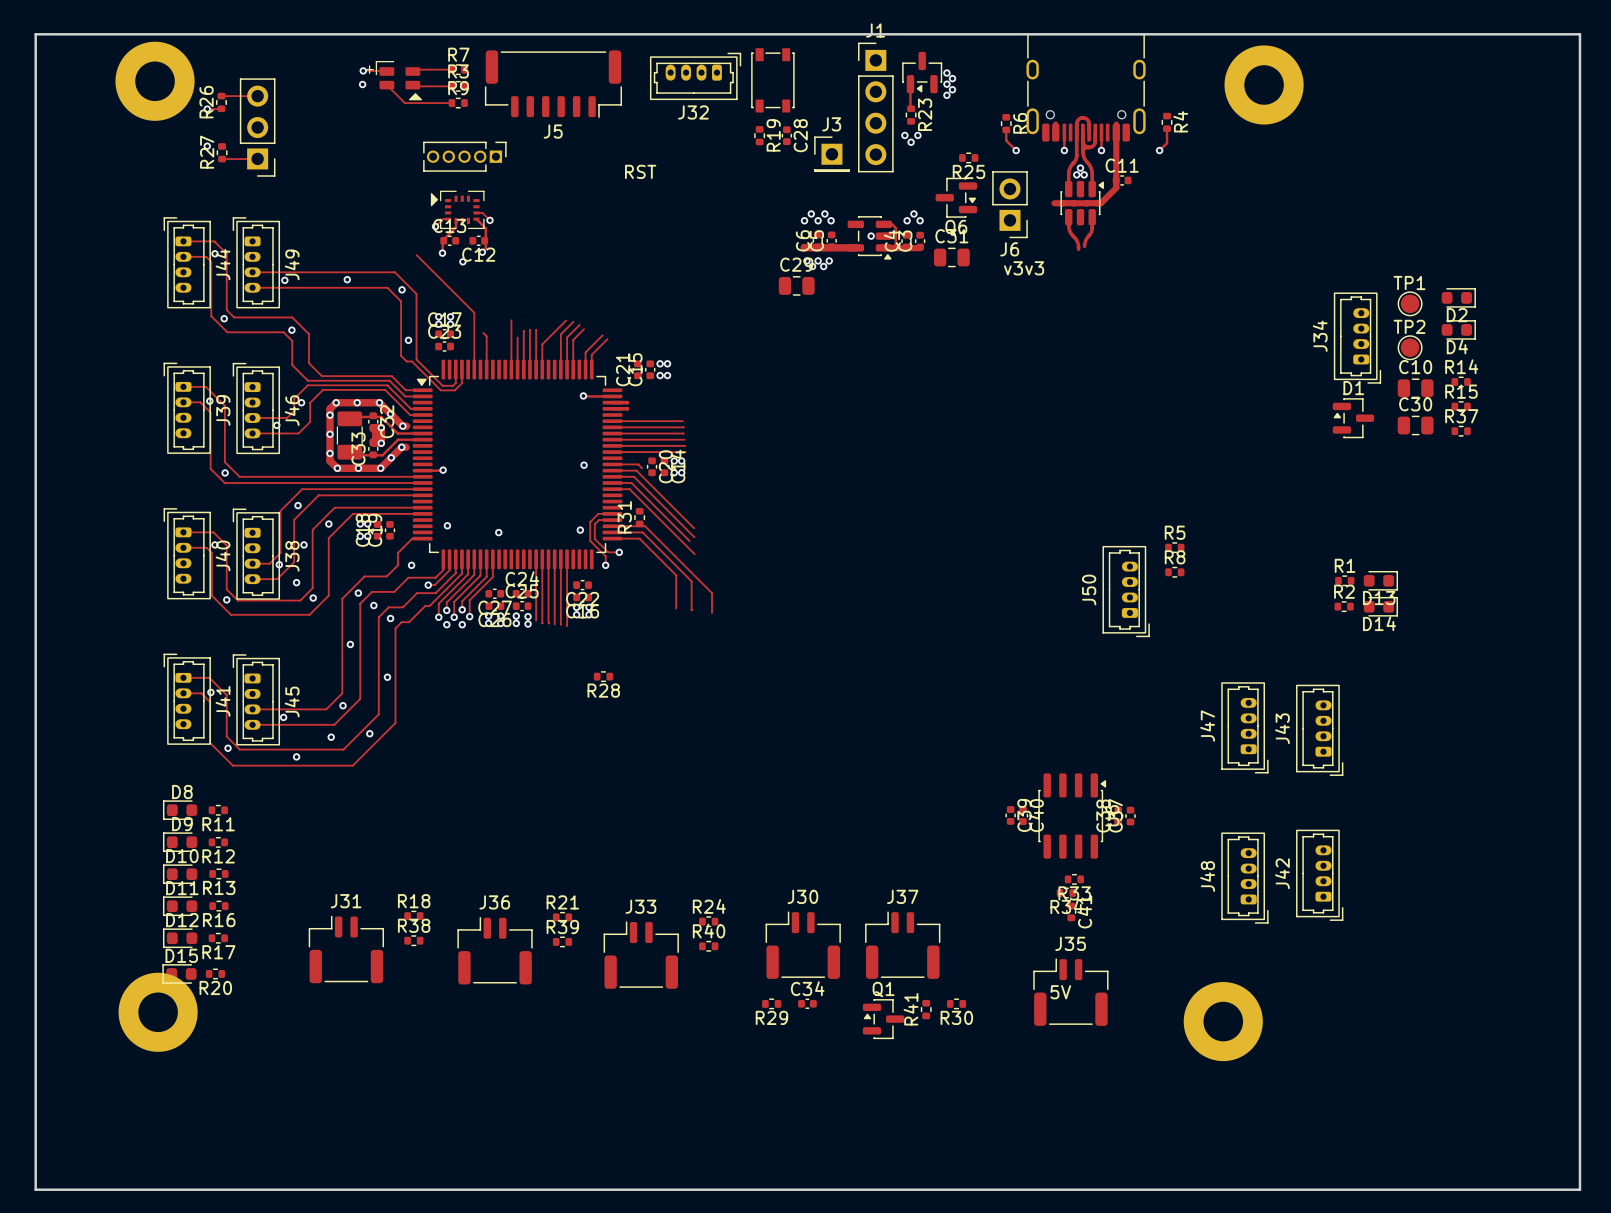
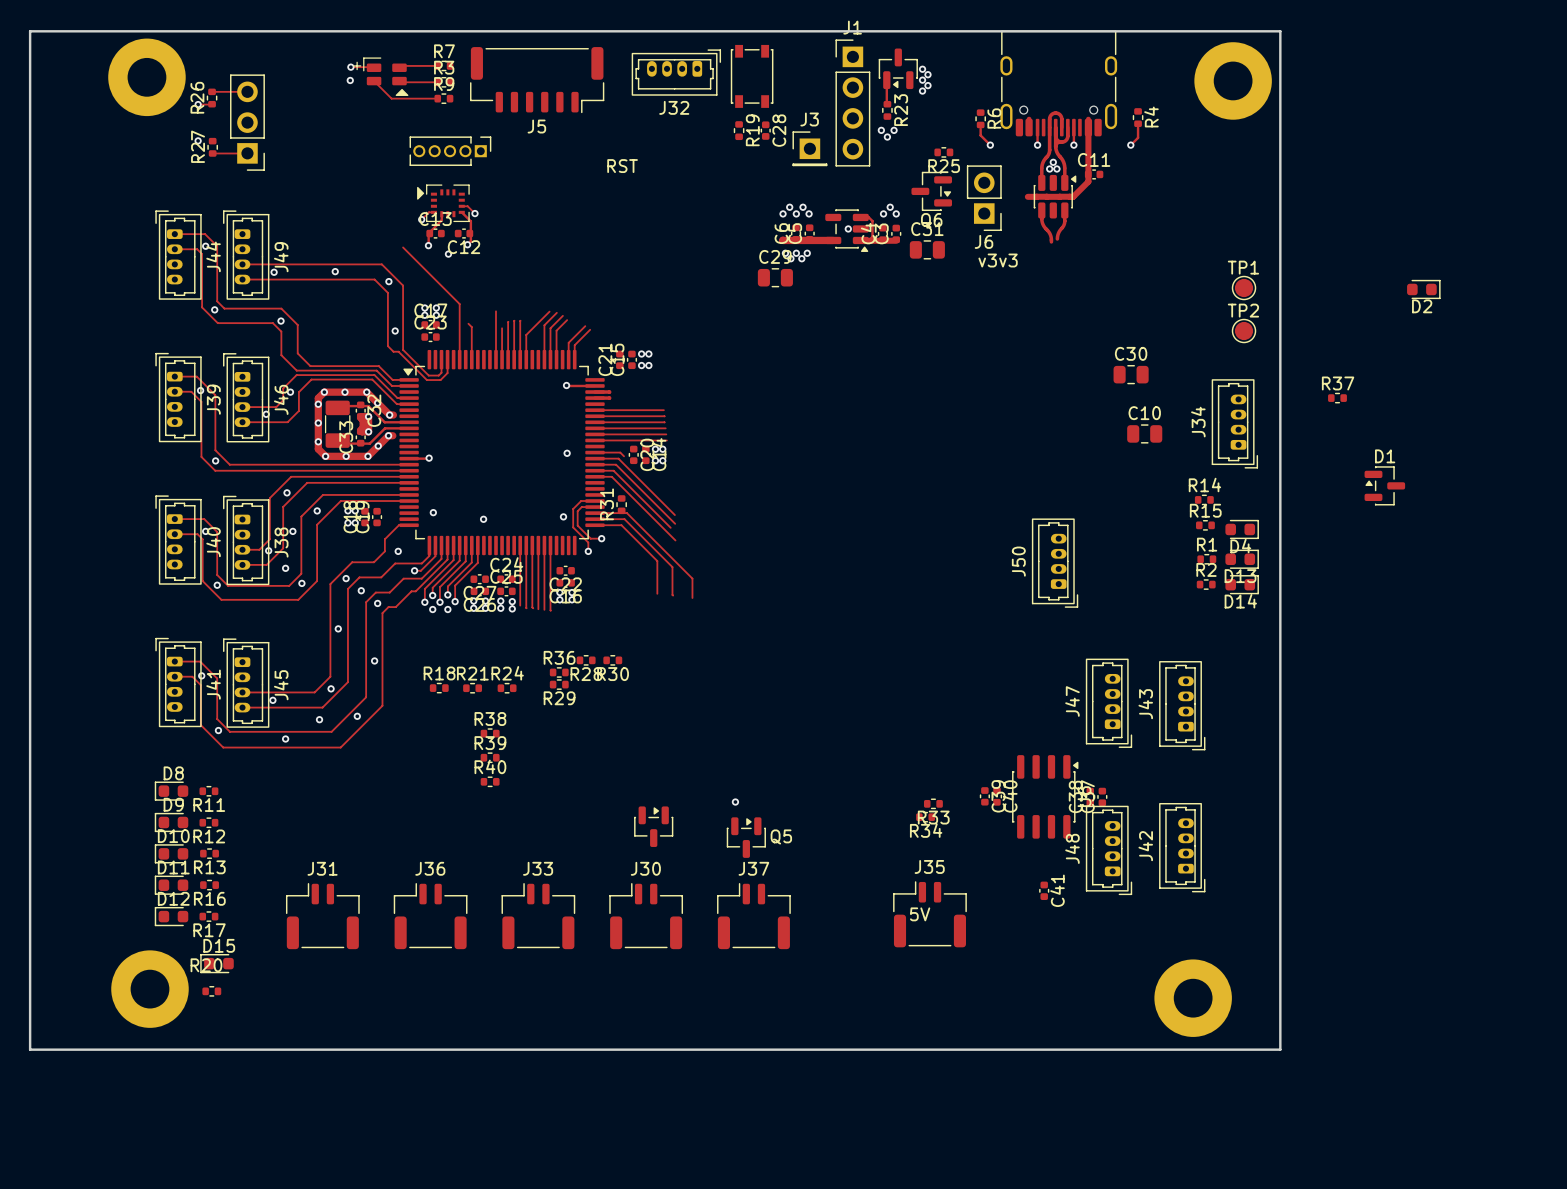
board edge: (1312, 34) (1579, 34) (1579, 1189) (35, 1189) (35, 1074) -> (1280, 31) (1280, 1049) (30, 1049)
TP1 position: (1410, 303) -> (1244, 288)
D4 position: (1458, 329) -> (1242, 529)
J34 position: (1357, 338) -> (1234, 423)
TP2 position: (1410, 347) -> (1244, 331)
R14 position: (1461, 381) -> (1204, 499)
C10 position: (1415, 388) -> (1144, 433)
R15 position: (1461, 406) -> (1205, 525)
D1 position: (1353, 418) -> (1384, 485)
C30 position: (1415, 425) -> (1131, 374)
R37 position: (1461, 431) -> (1337, 398)
R5: (1174, 547) -> none
R8: (1174, 572) -> none
R1 position: (1344, 580) -> (1206, 559)
D13 position: (1380, 580) -> (1242, 559)
J50 position: (1126, 591) -> (1055, 563)
R2 position: (1344, 606) -> (1206, 584)
D14 position: (1380, 606) -> (1242, 584)
R36: none -> (559, 672)
J47 position: (1244, 727) -> (1109, 703)
J43 position: (1319, 730) -> (1182, 705)
via: none -> (735, 802)
part: none -> (653, 826)
Q5: none -> (746, 837)
J42 position: (1319, 875) -> (1182, 847)
J48 position: (1244, 878) -> (1109, 850)
R33 position: (1074, 879) -> (933, 803)
R34 position: (1066, 892) -> (925, 817)
R18 position: (413, 916) -> (439, 688)
R21 position: (562, 917) -> (472, 688)
R24 position: (708, 921) -> (507, 688)
R38 position: (413, 940) -> (490, 733)
R39 position: (562, 941) -> (490, 757)
J30 position: (803, 945) -> (646, 916)
J37 position: (902, 945) -> (753, 916)
R40 position: (708, 946) -> (490, 781)
J31 position: (346, 949) -> (322, 916)
J36 position: (495, 950) -> (430, 916)
J33 position: (641, 955) -> (538, 916)
D15 position: (179, 973) -> (217, 963)
R20 position: (215, 973) -> (211, 991)
text position: 5V (1060, 992) -> 5V (920, 914)
J35 position: (1070, 992) -> (929, 914)
R29 position: (771, 1003) -> (559, 684)
C34: (807, 1003) -> none
R30 position: (956, 1003) -> (612, 660)
R41: (926, 1009) -> none
Q1: (883, 1019) -> none

